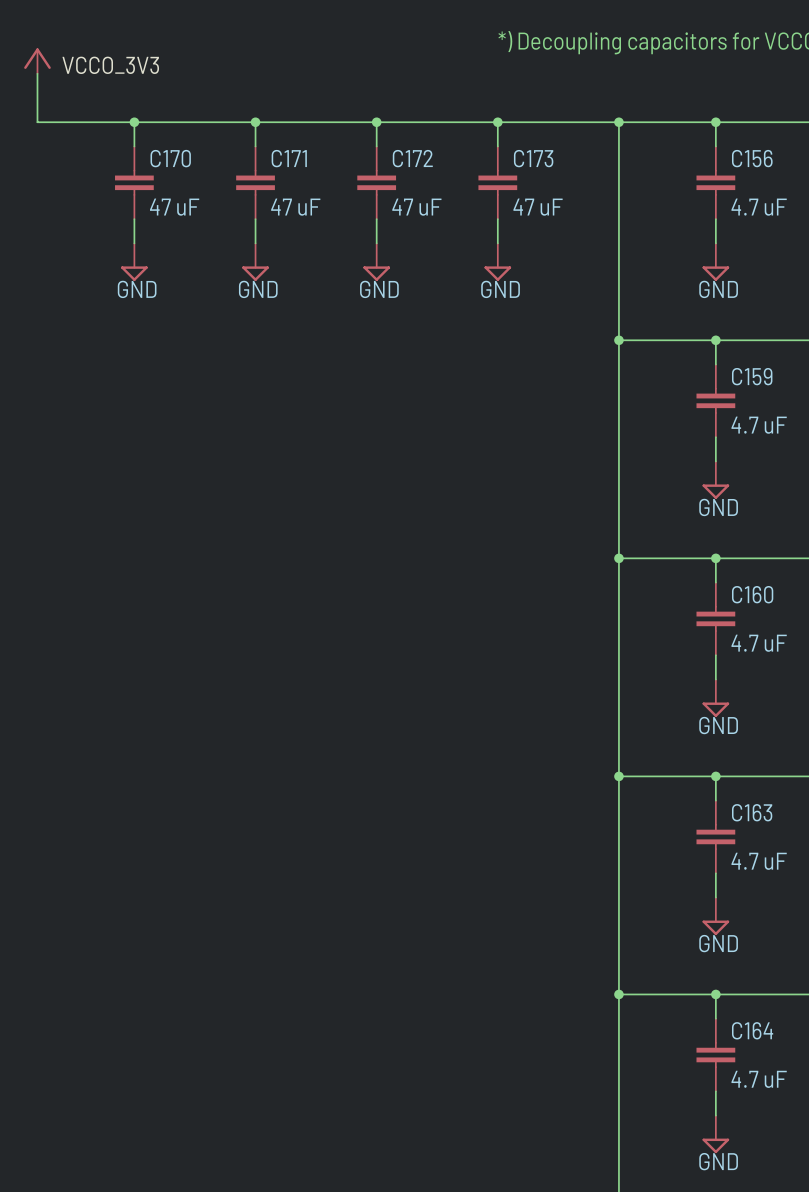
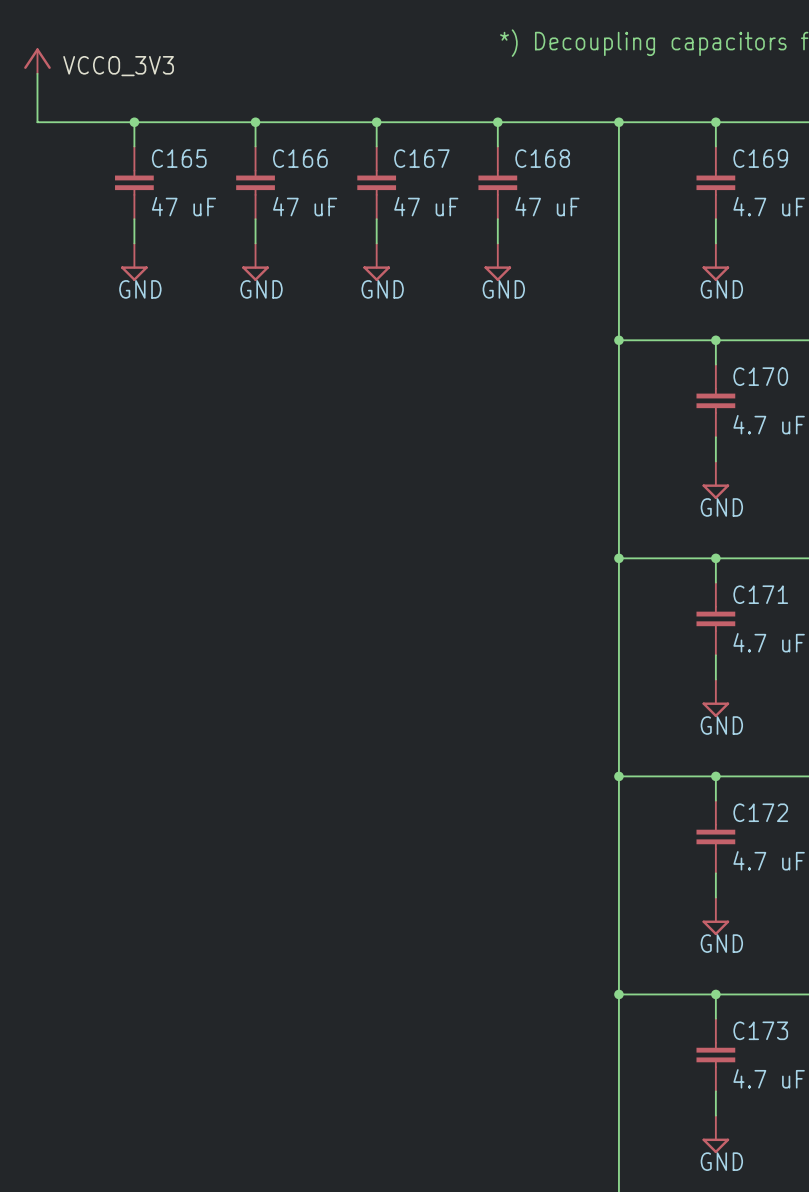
C170 name: C170 (170, 158) -> C165 (179, 158)
C171 name: C171 (289, 158) -> C166 (300, 158)
C172 name: C172 (412, 158) -> C167 (421, 158)
C173 name: C173 (533, 158) -> C168 (542, 158)
C156 name: C156 (752, 158) -> C169 (760, 158)
C159 name: C159 (752, 376) -> C170 (760, 376)
C160 name: C160 (752, 594) -> C171 (760, 594)
C163 name: C163 (752, 812) -> C172 (760, 812)
C164 name: C164 (752, 1030) -> C173 (760, 1030)

